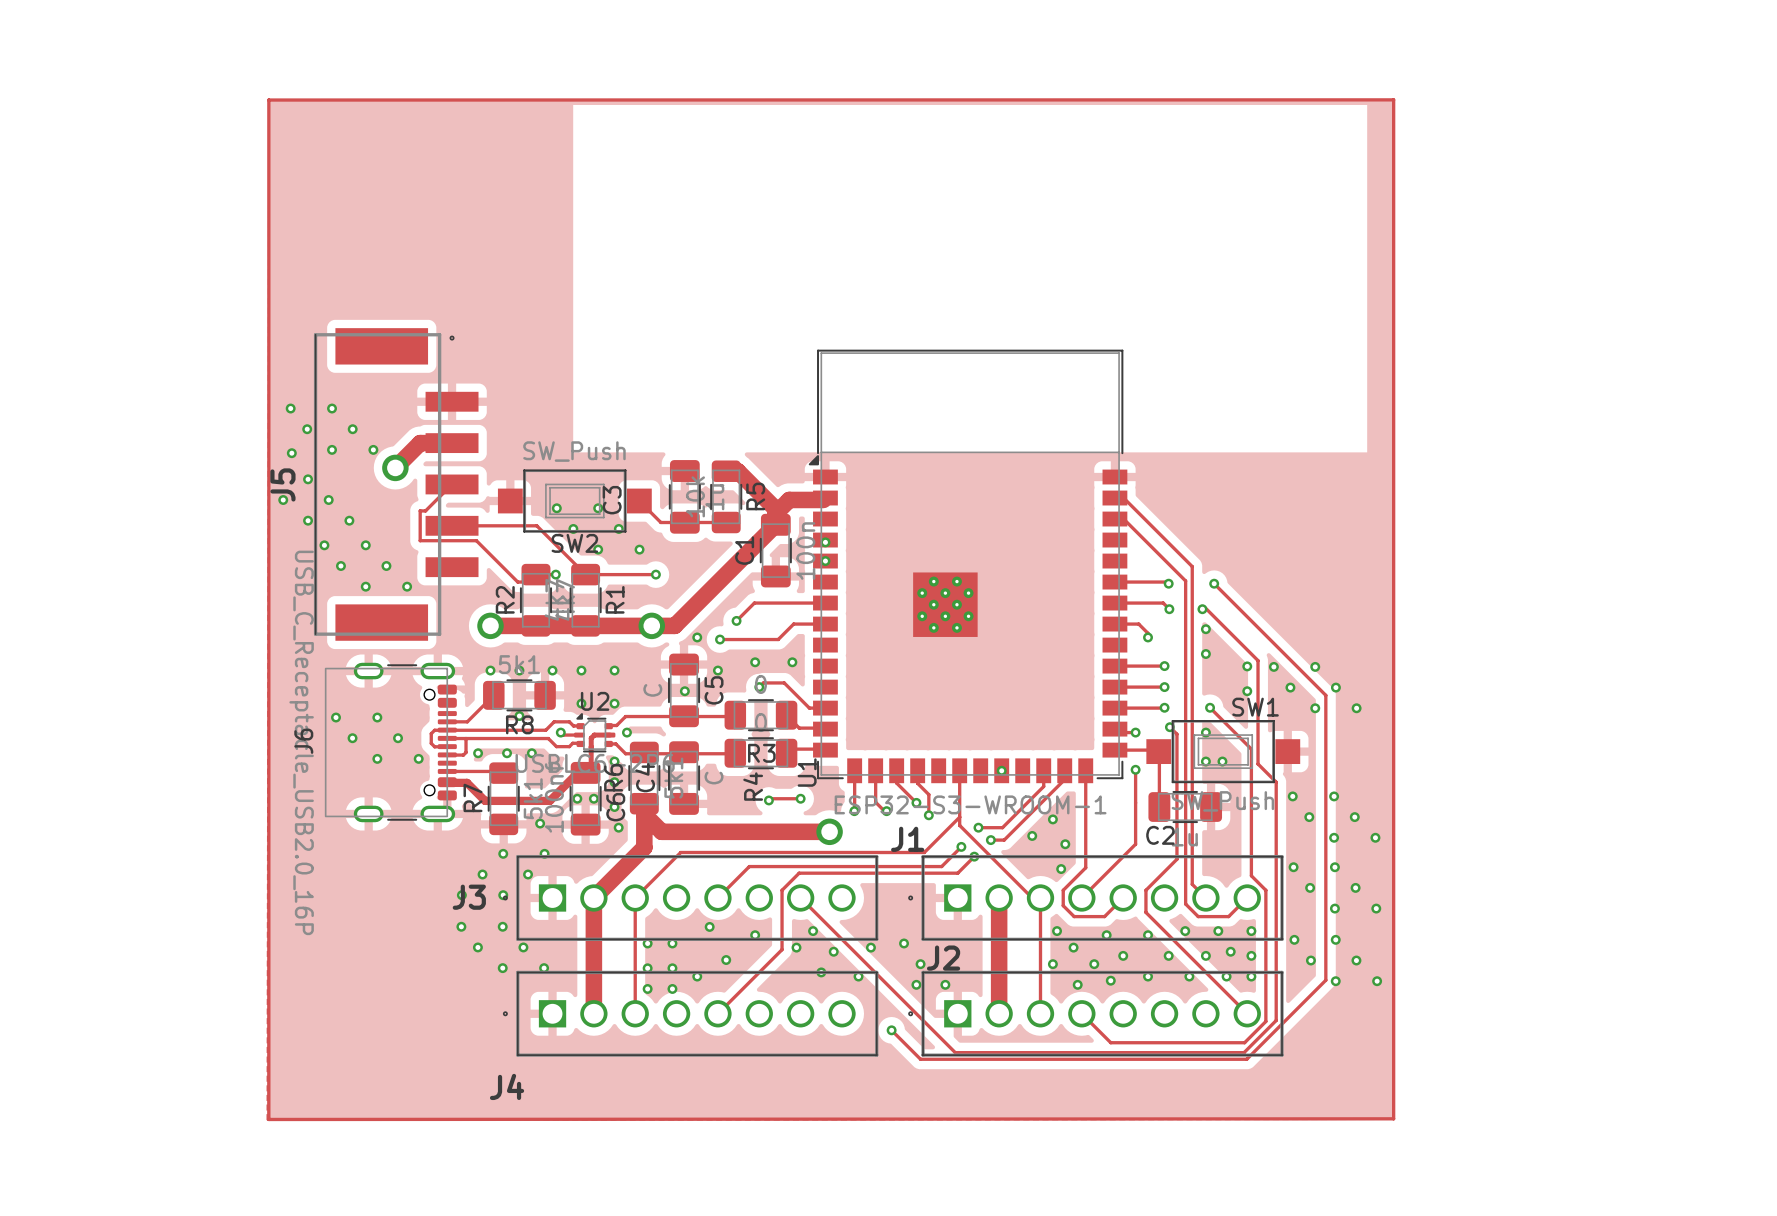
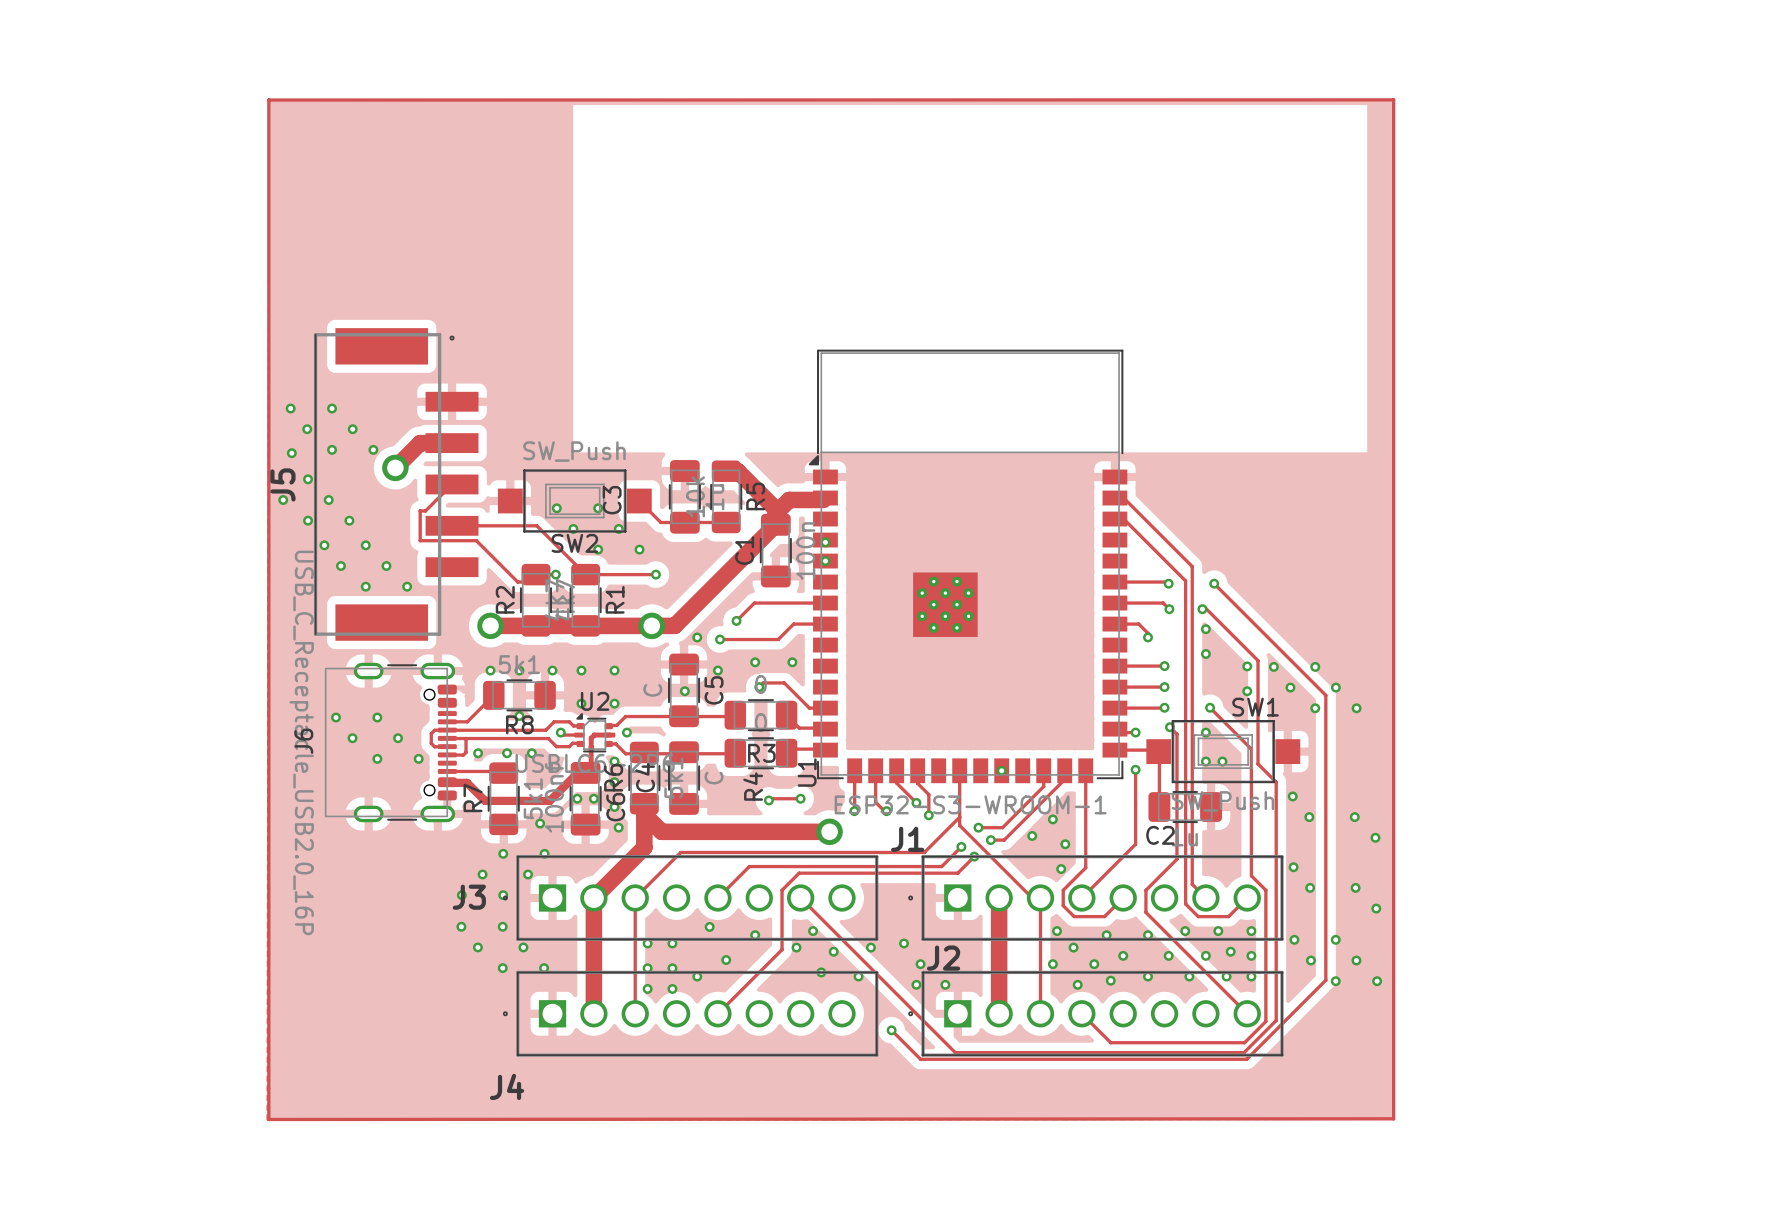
via: (1334, 796) -> none
via: (1334, 837) -> none
via: (1334, 867) -> none
via: (1334, 908) -> none

